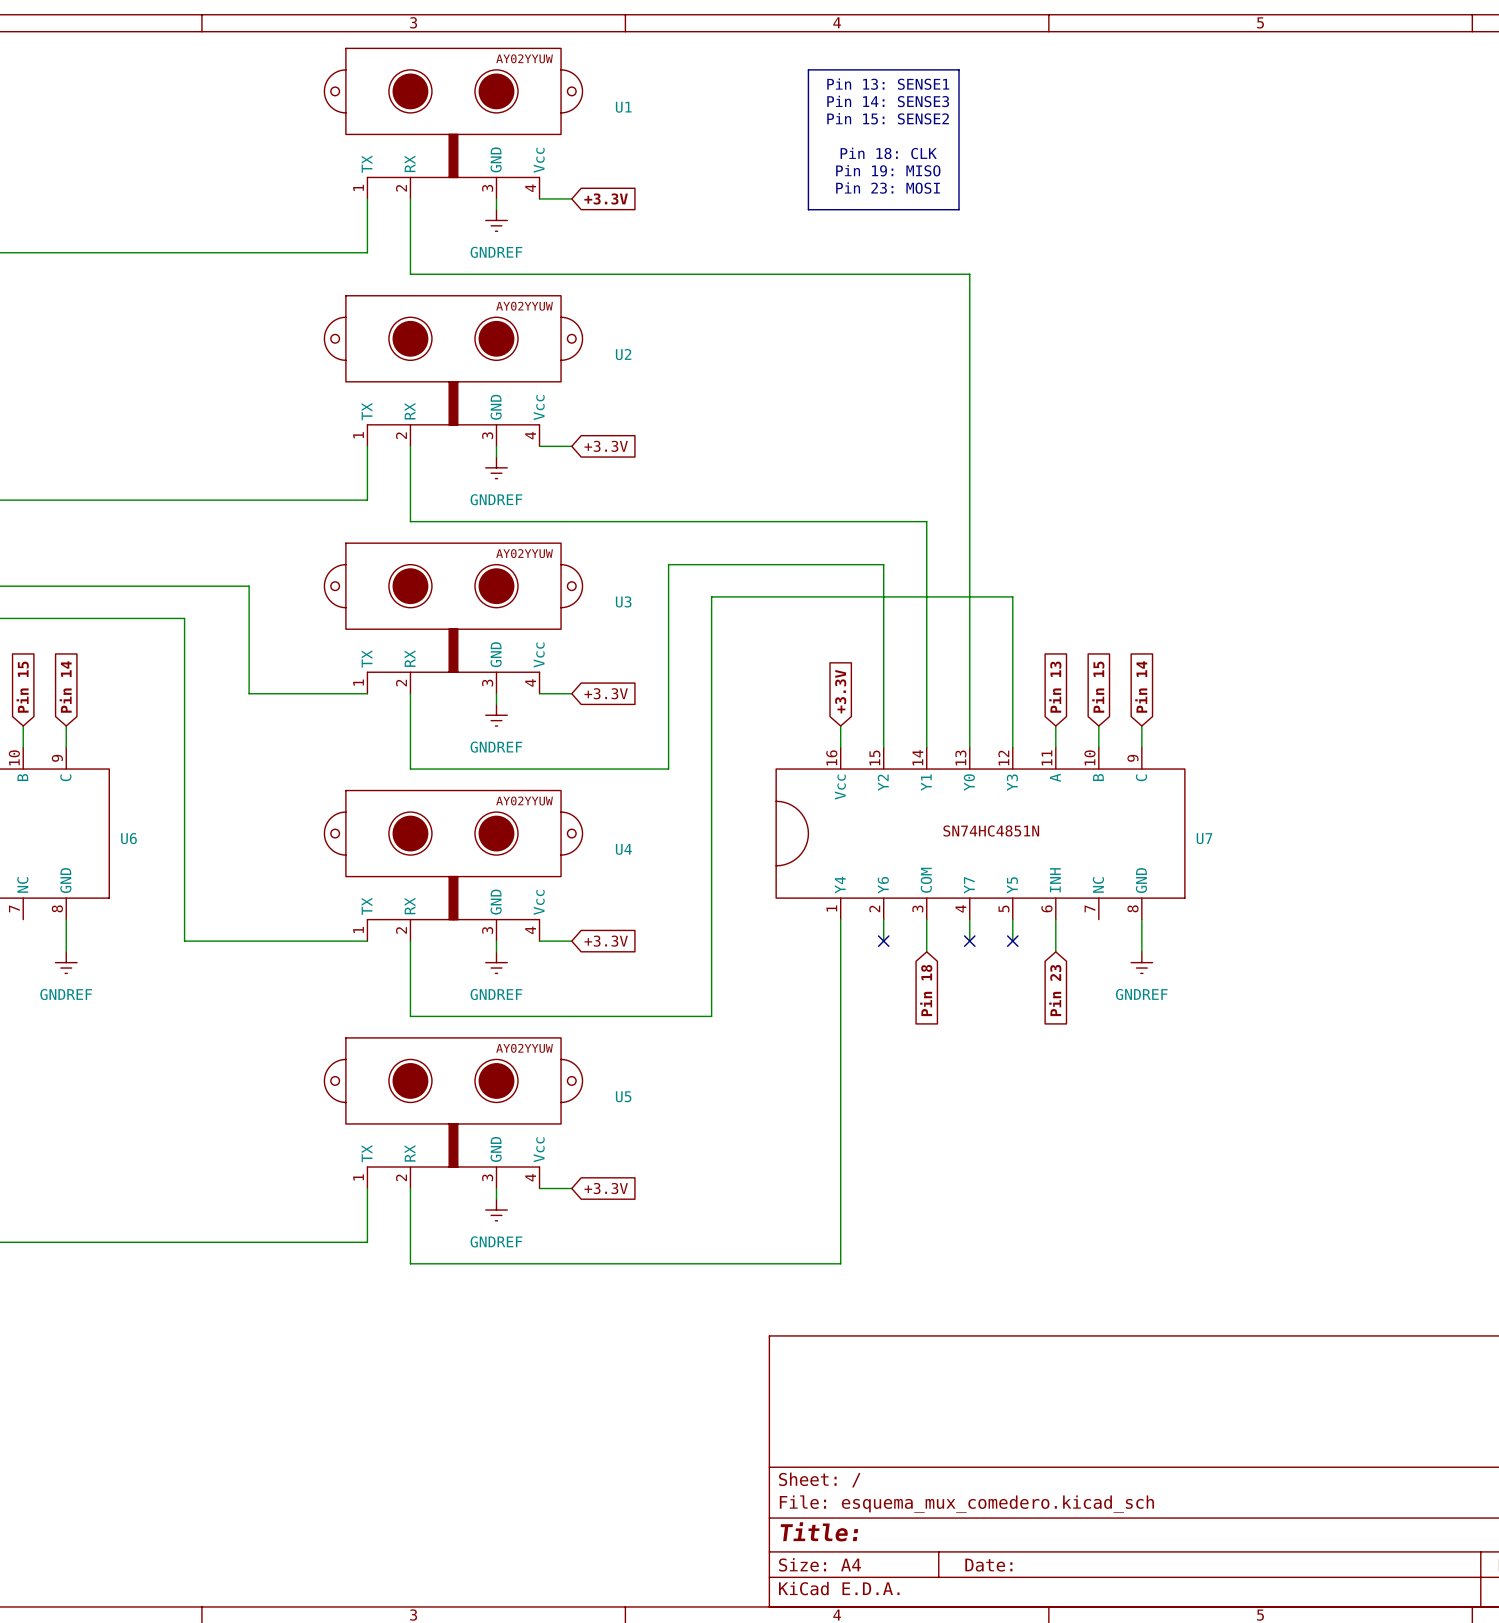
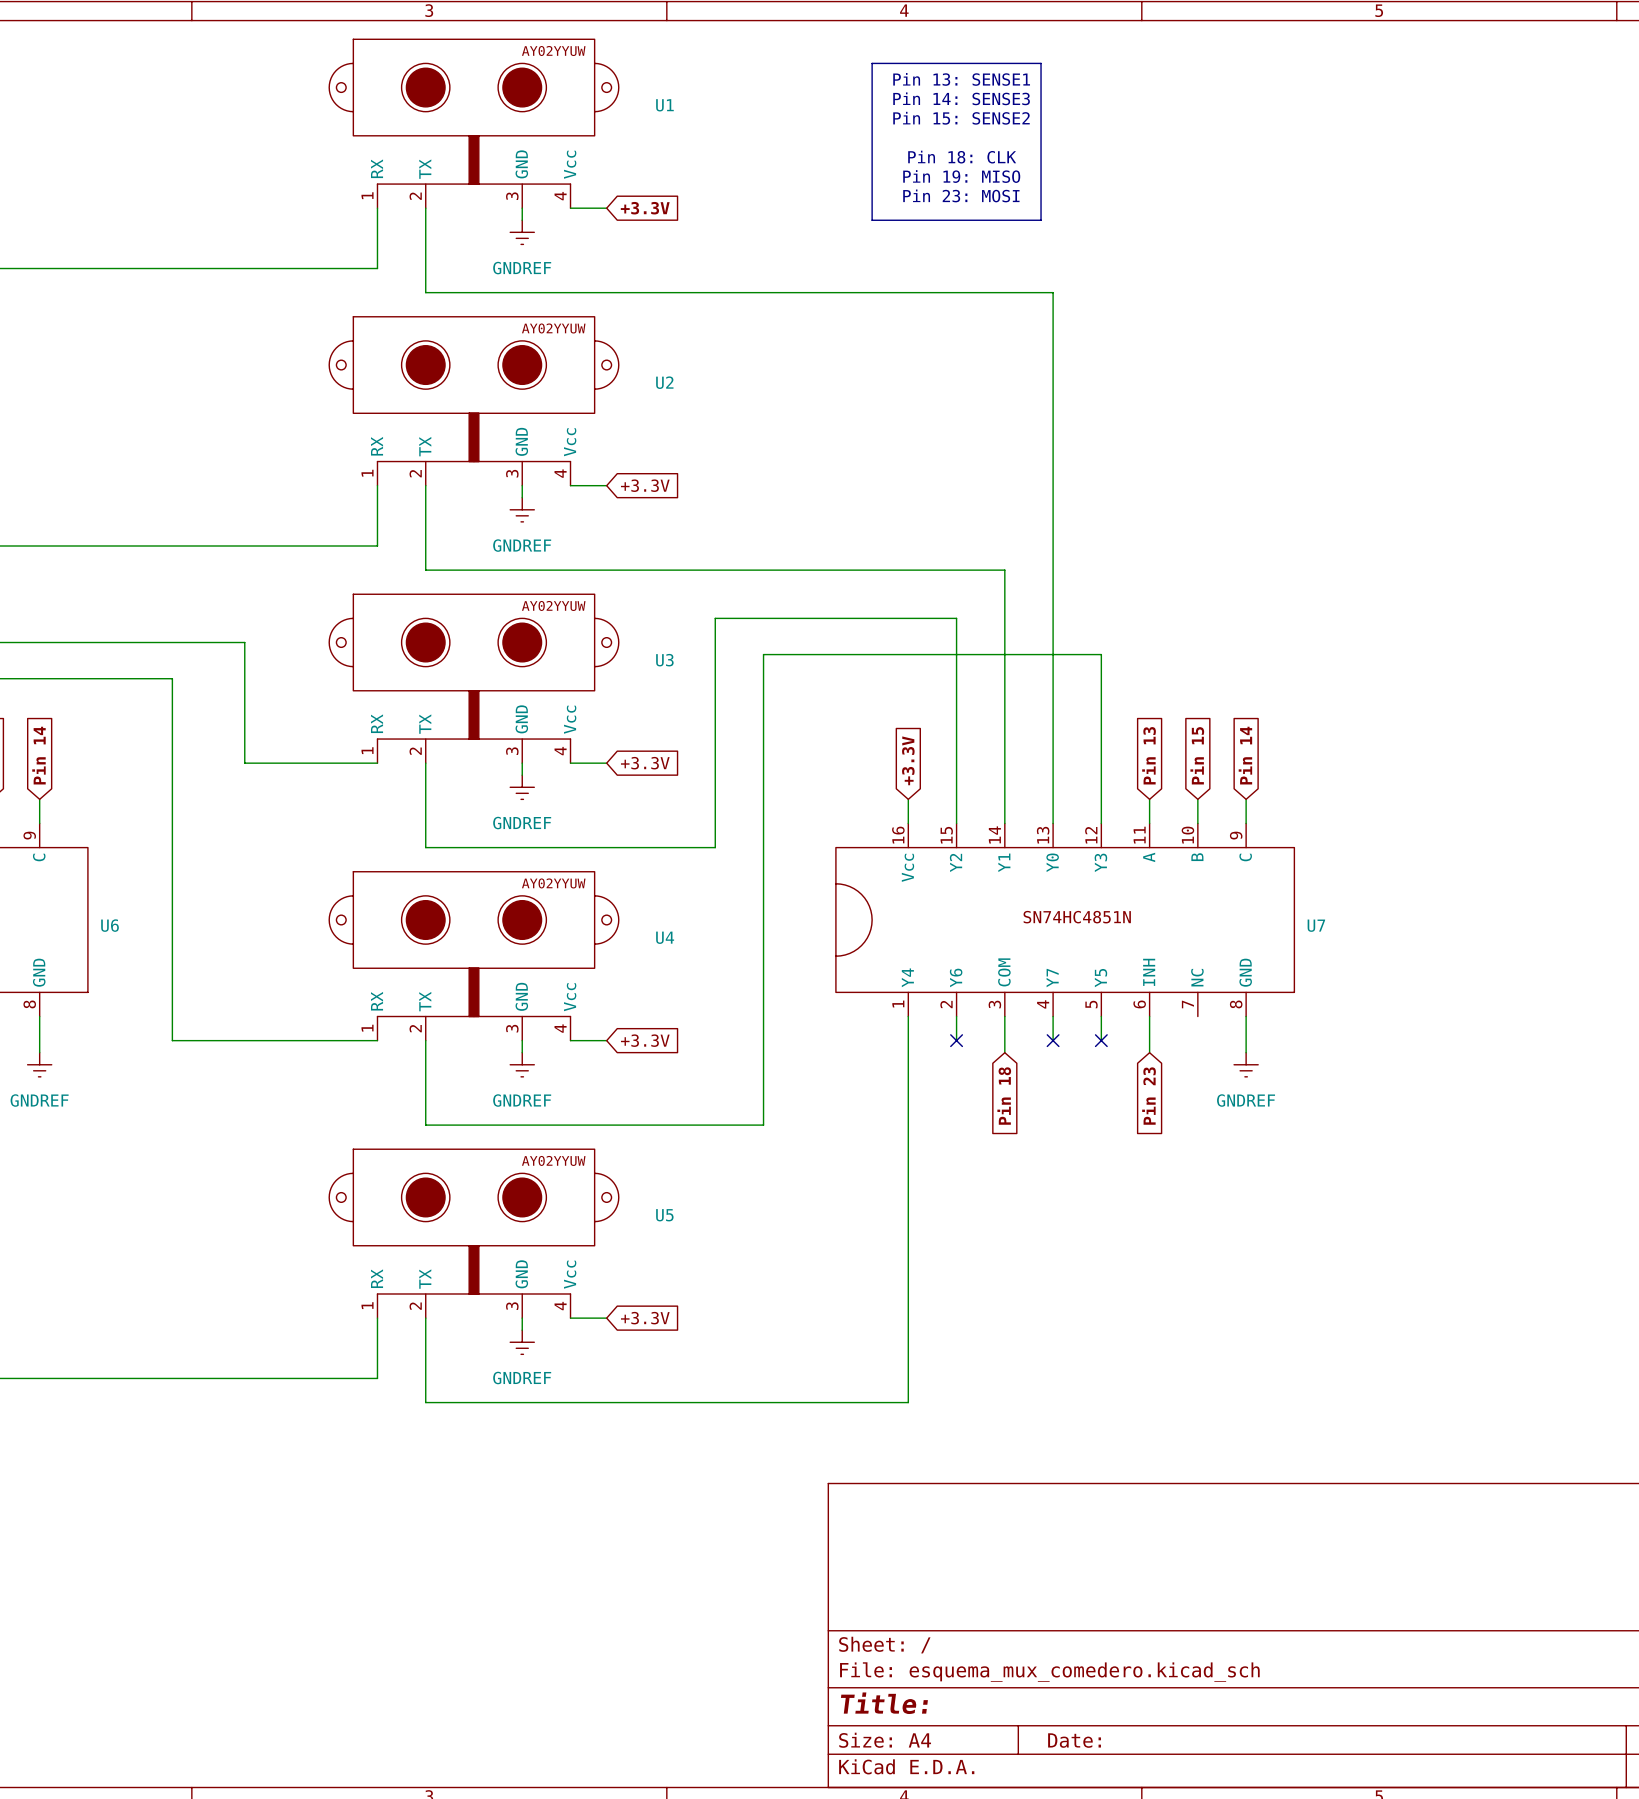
U1 pin name: RX (410, 163) -> TX (425, 169)
U1 pin name: TX (367, 164) -> RX (377, 168)
U2 pin name: TX (367, 411) -> RX (377, 446)
U2 pin name: RX (410, 411) -> TX (425, 446)
U3 pin name: TX (367, 658) -> RX (377, 723)
U3 pin name: RX (410, 658) -> TX (425, 724)
U4 pin name: RX (410, 905) -> TX (425, 1001)
U4 pin name: TX (367, 906) -> RX (377, 1001)
U5 pin name: TX (367, 1153) -> RX (377, 1278)
U5 pin name: RX (410, 1153) -> TX (425, 1279)

